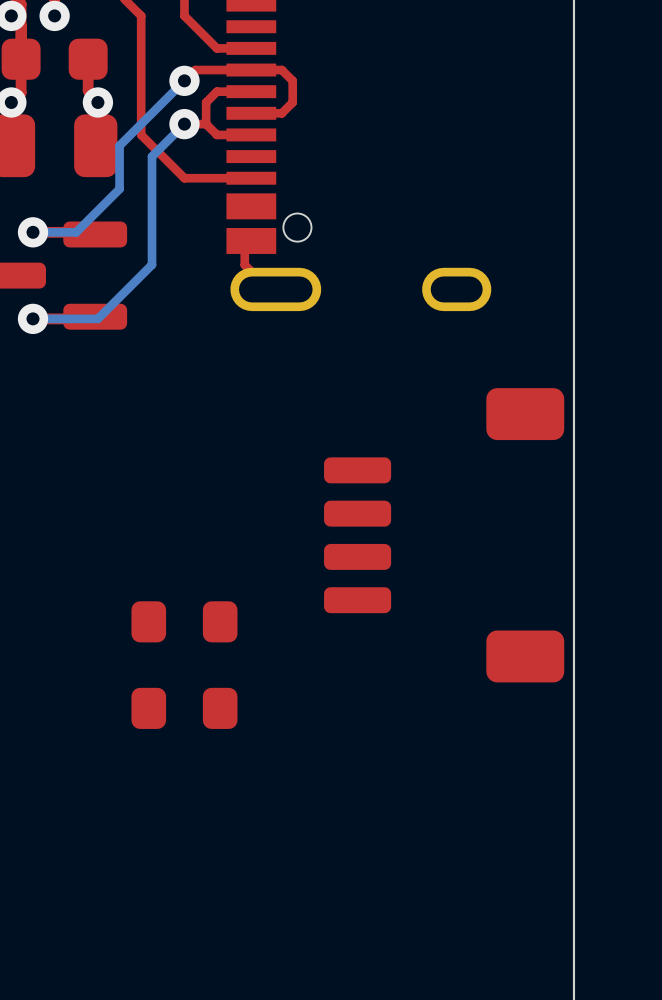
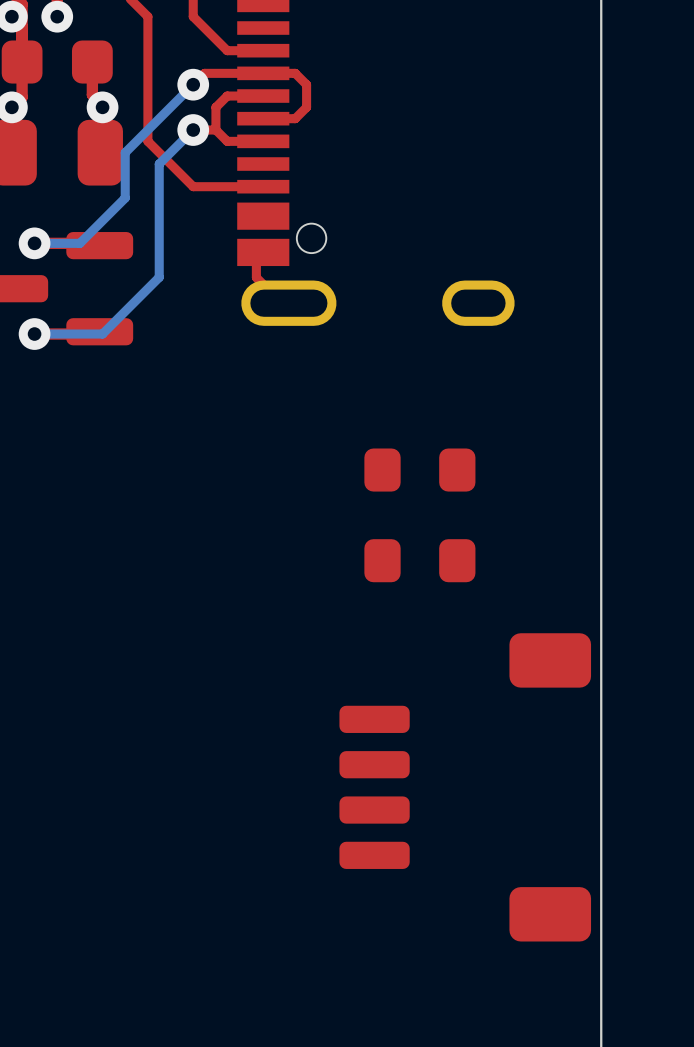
part footprint: [324, 388, 565, 683] -> [364, 539, 476, 583]
part: none -> (419, 470)
part: (184, 621) -> none
part: (184, 708) -> none
part: none -> (465, 787)

